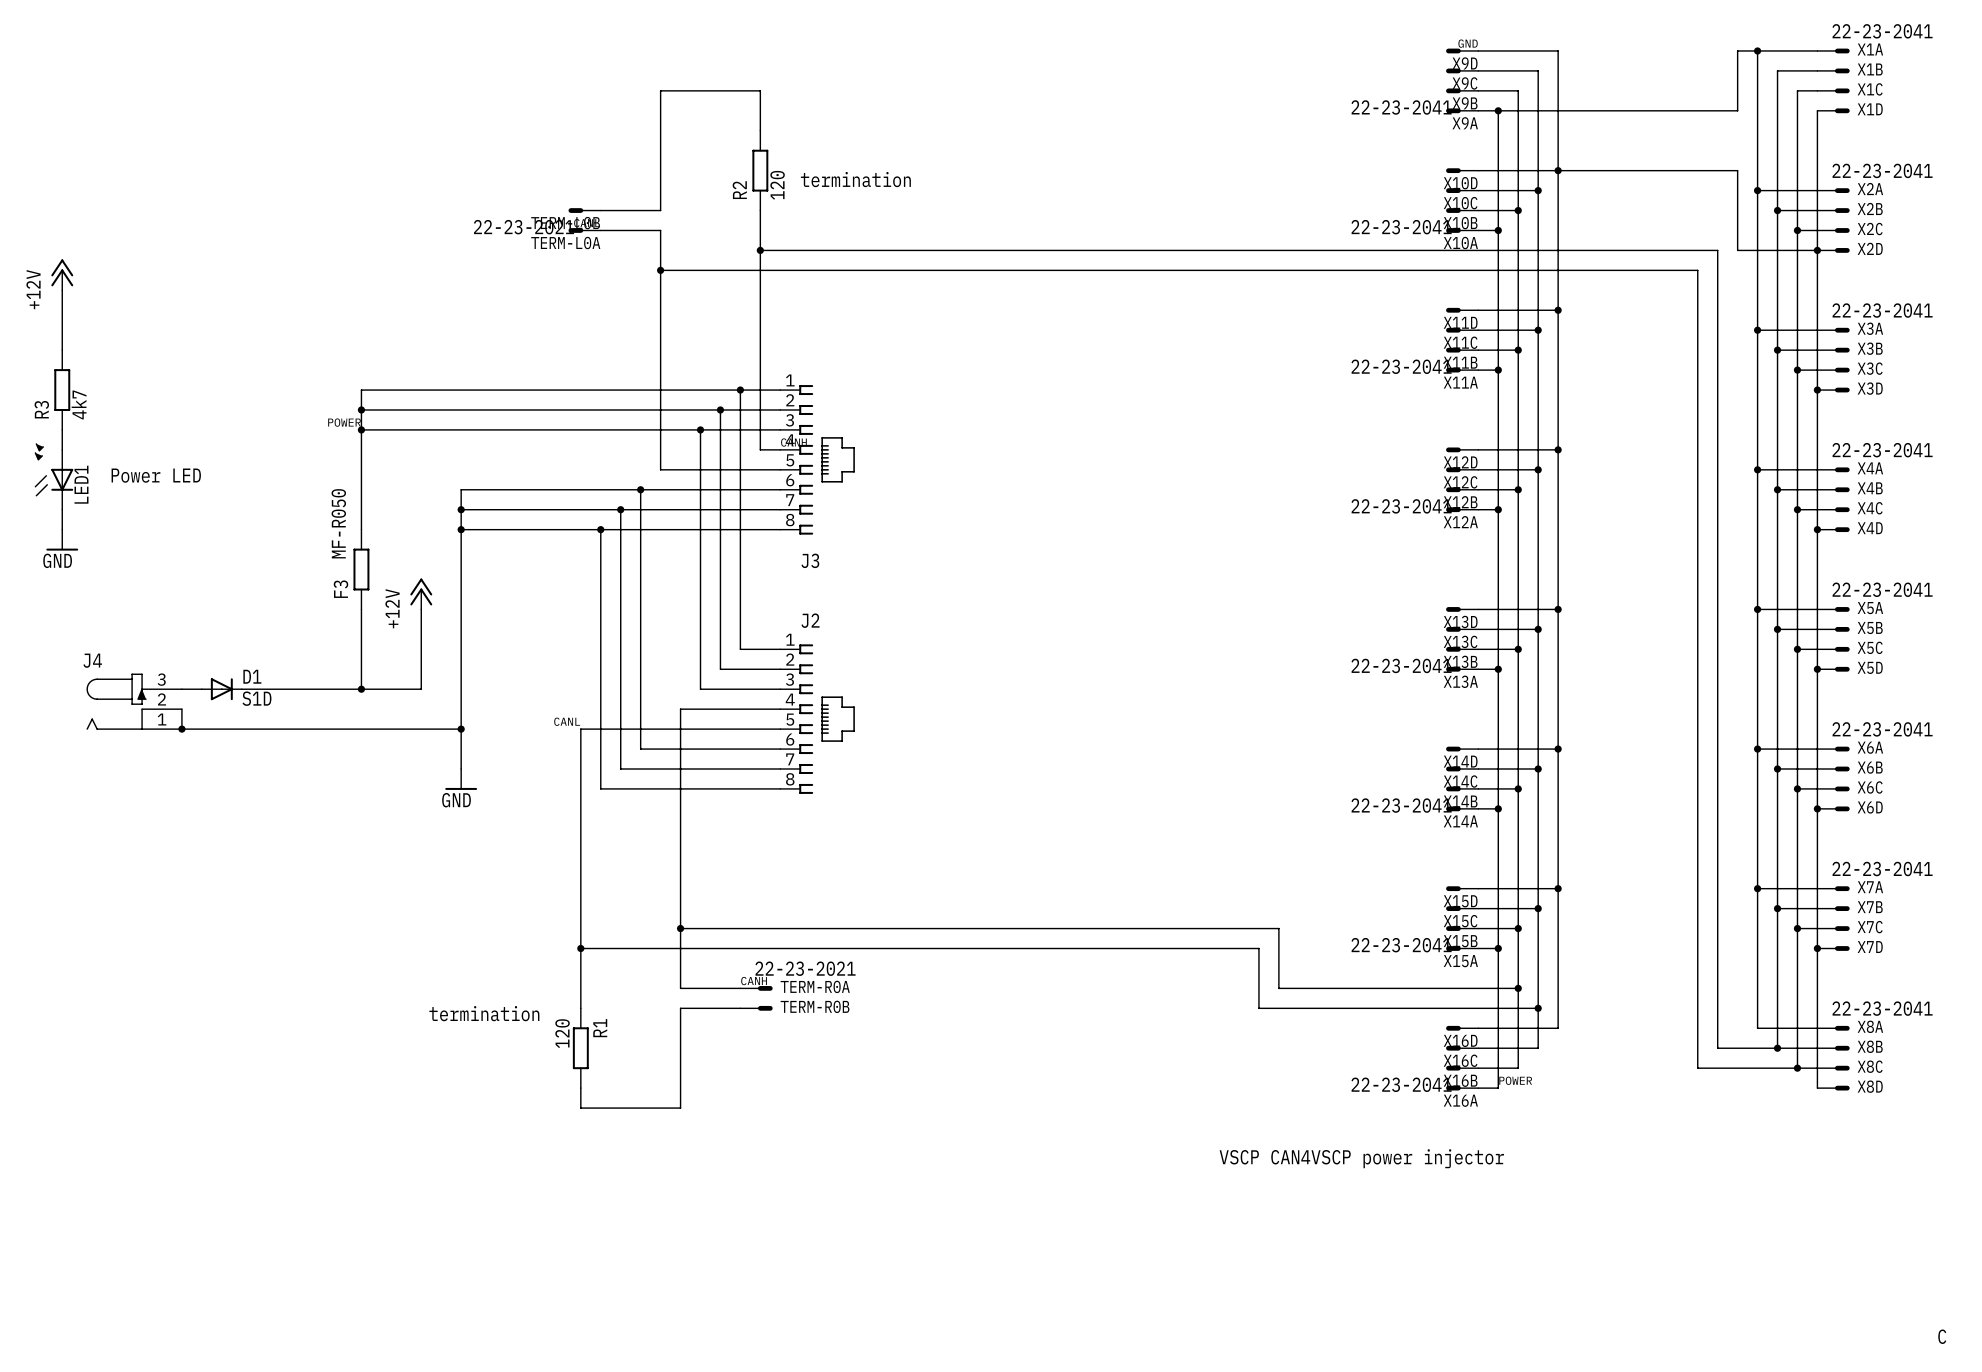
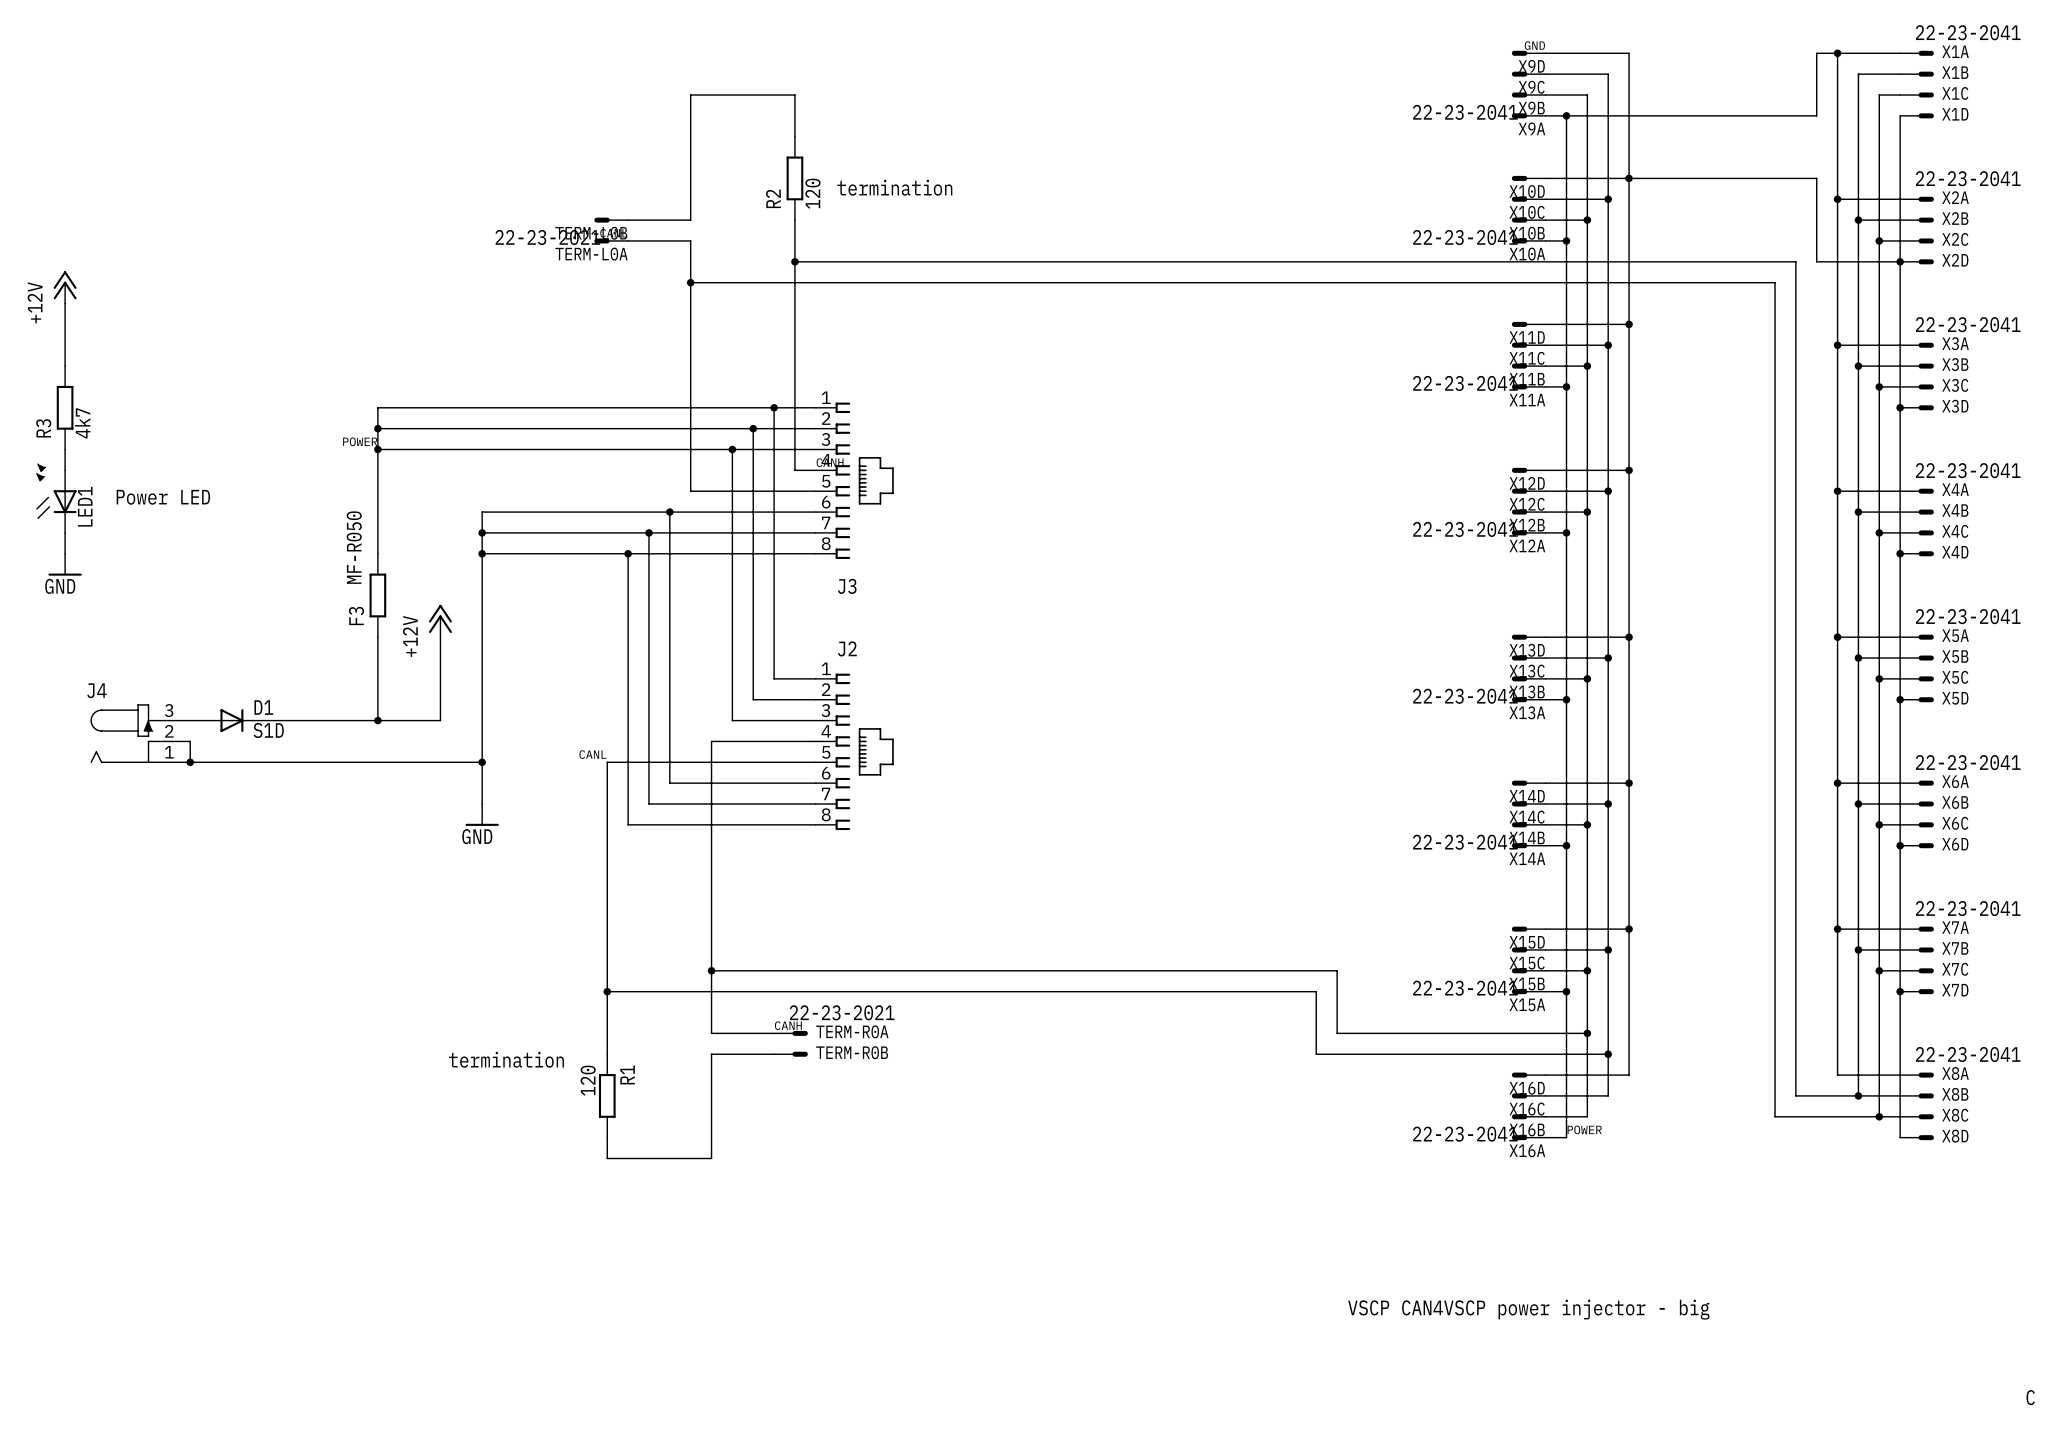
text: VSCP CAN4VSCP power injector (1361, 1158) -> none
text: none -> VSCP CAN4VSCP power injector - big (1528, 1309)

